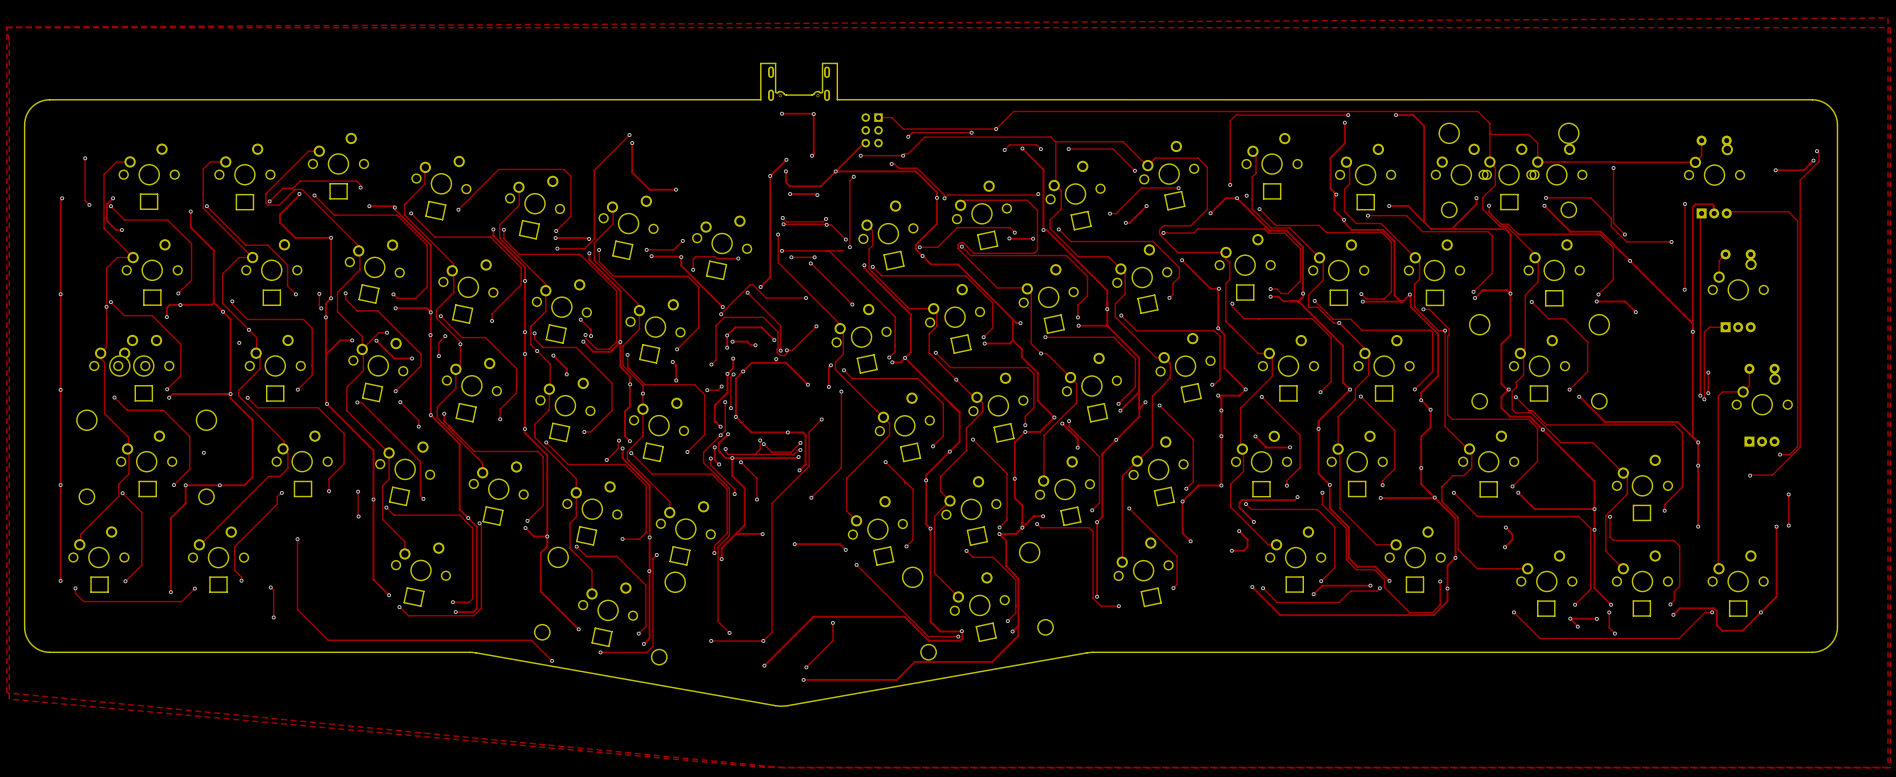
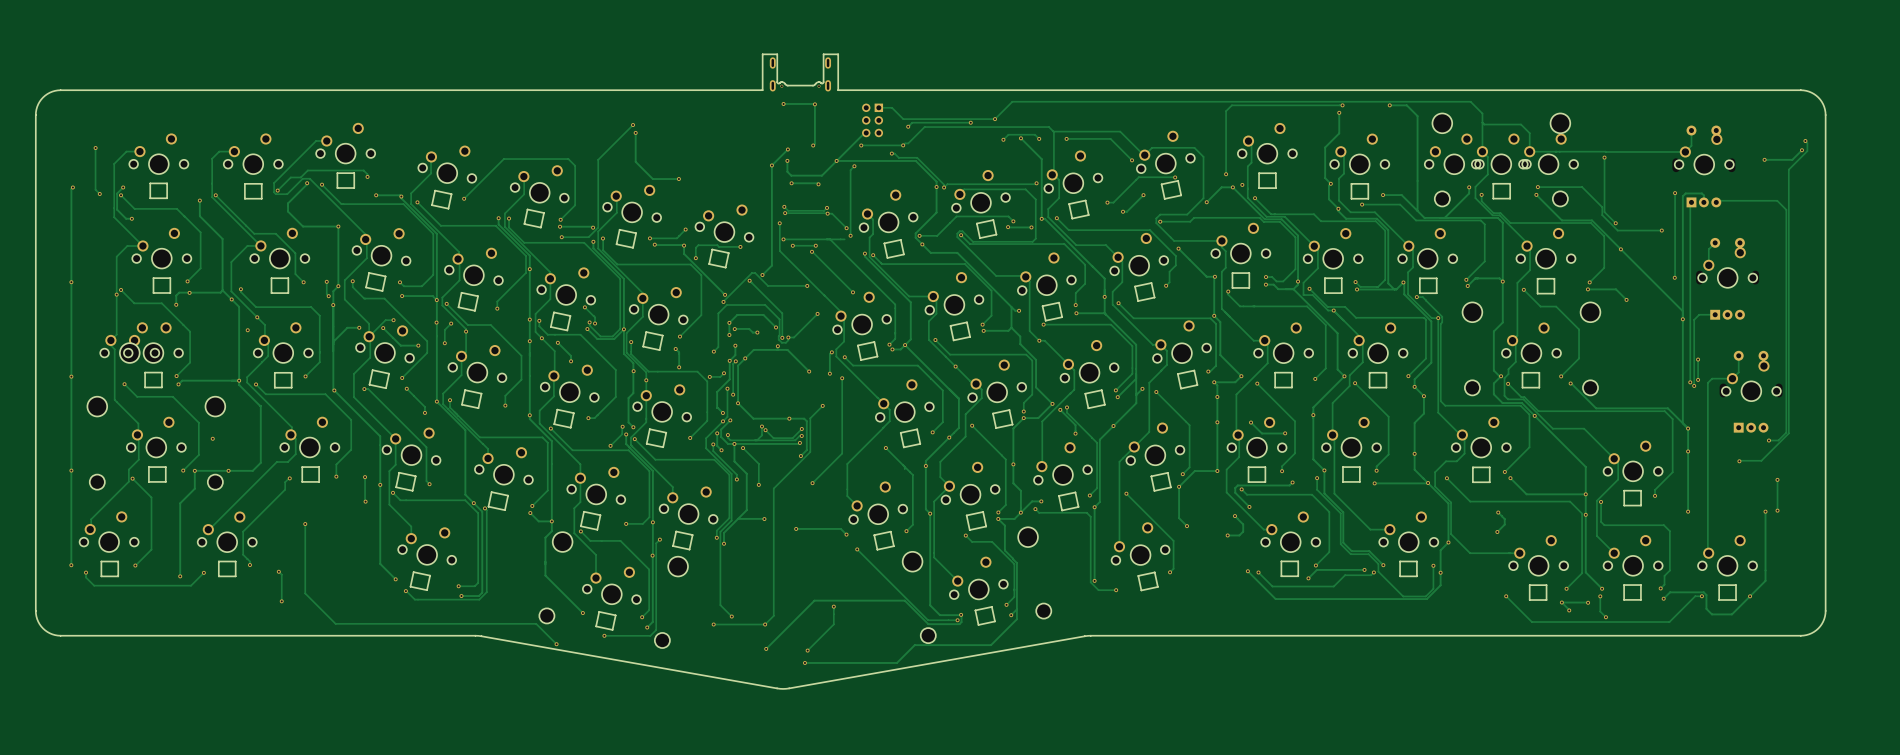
zone outline: (1887, 18) (6, 27) (9, 40) (9, 699) (765, 767) (1887, 767) (1887, 18) -> none
zone outline: (6, 27) (6, 692) (784, 767) (1890, 767) (1890, 27) (6, 27) -> none

